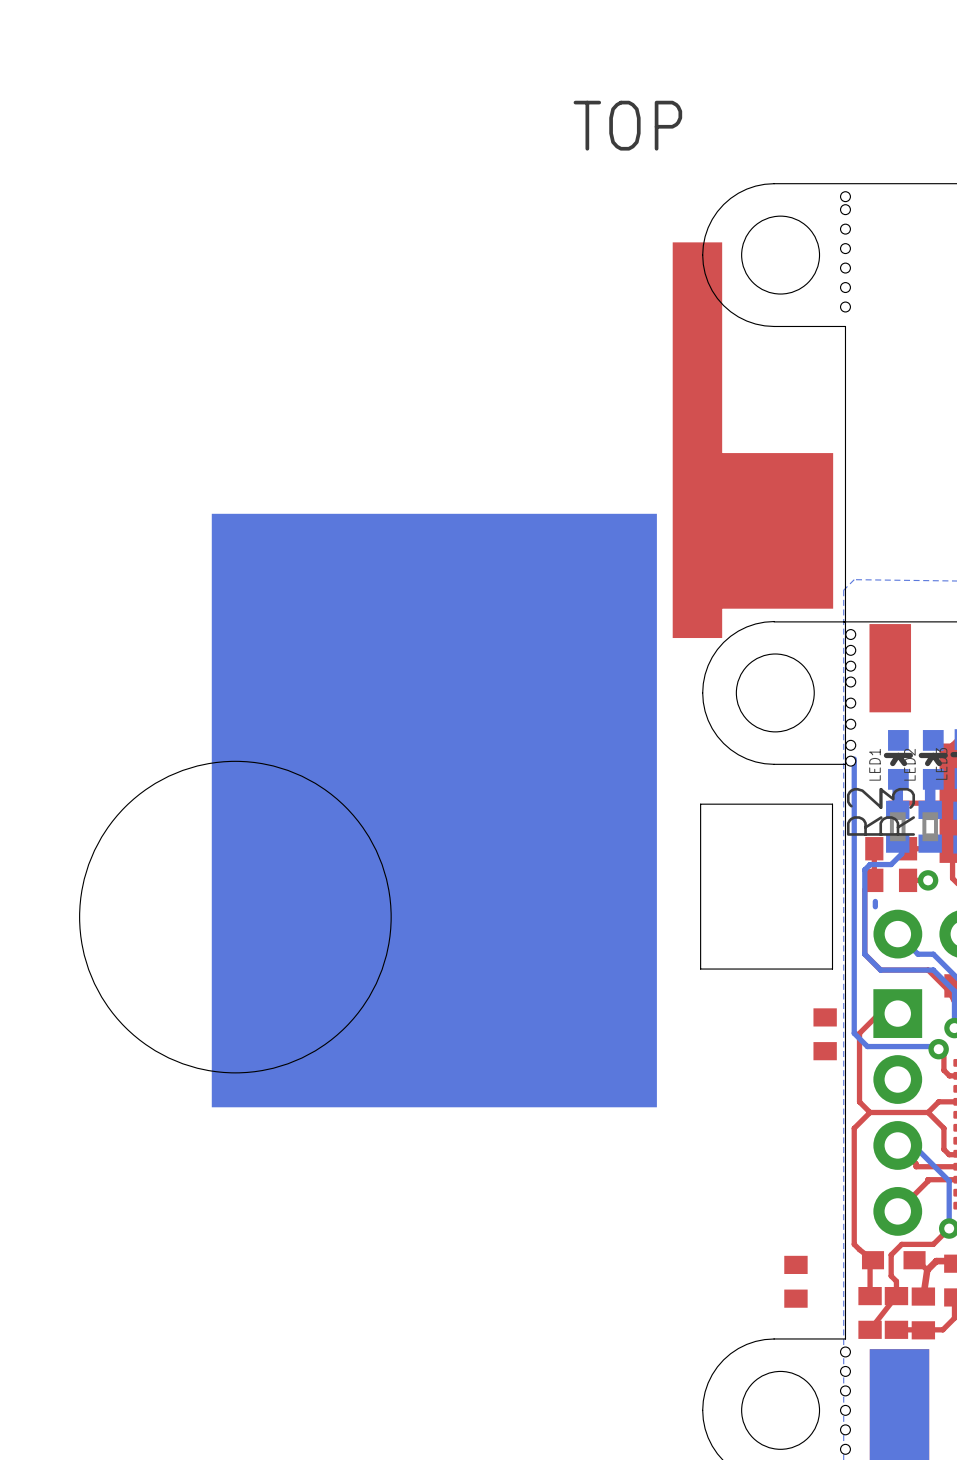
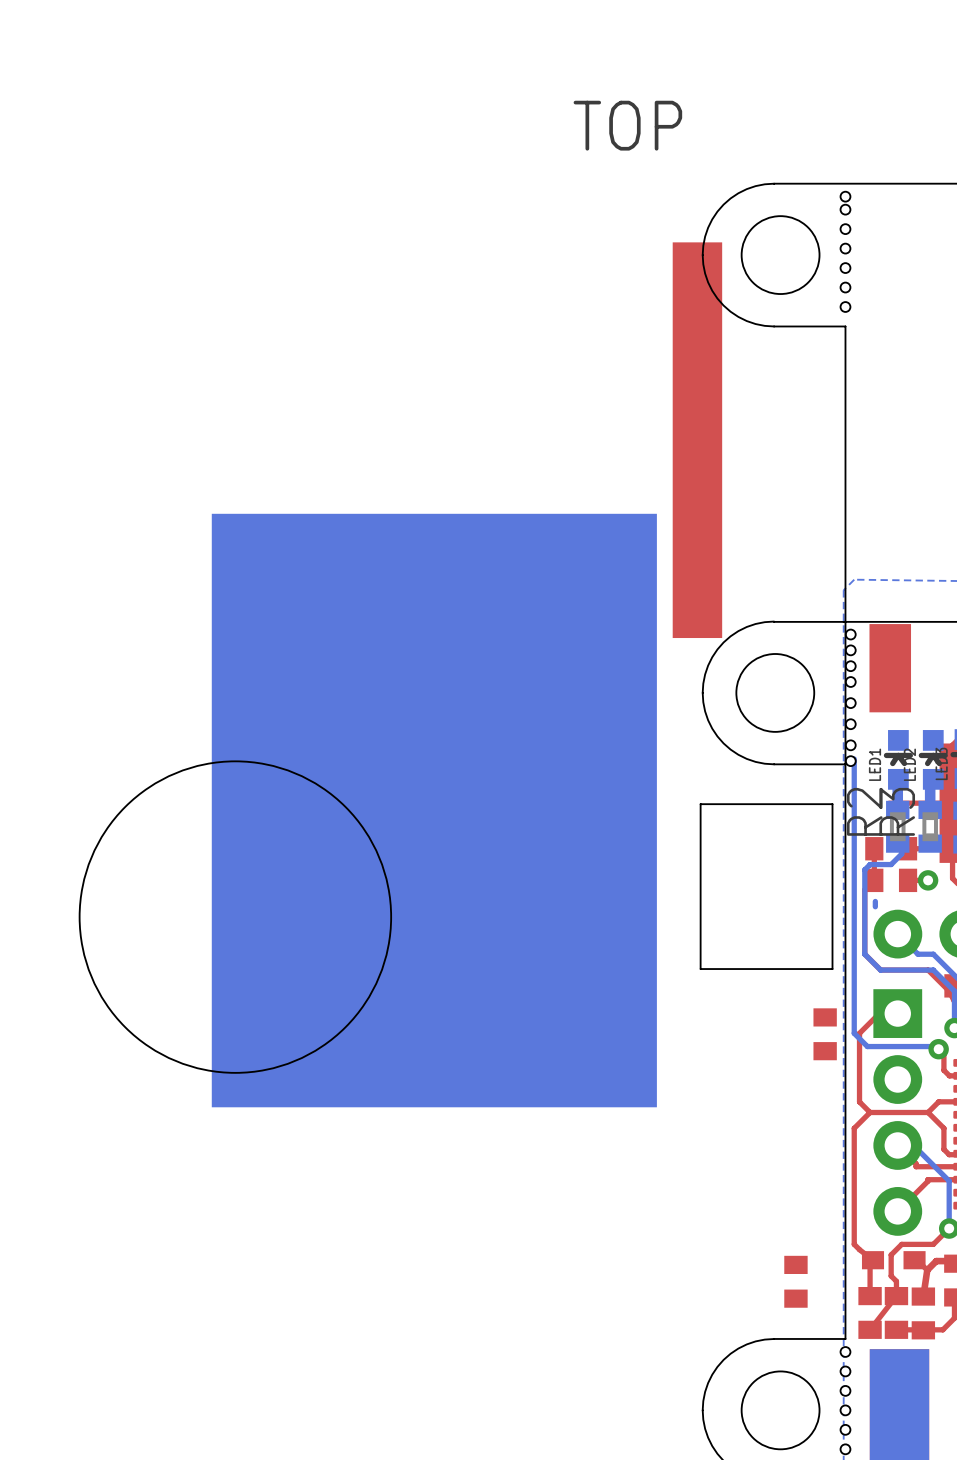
drawing: [715, 453, 834, 609] -> none

